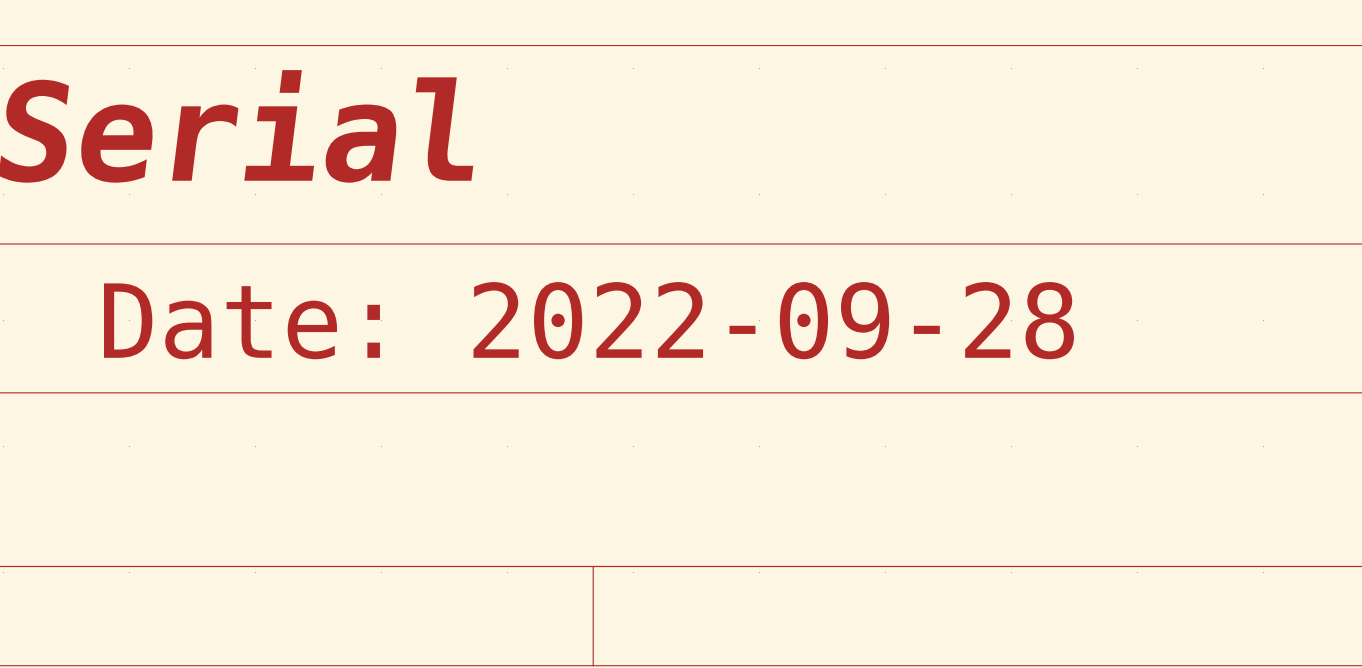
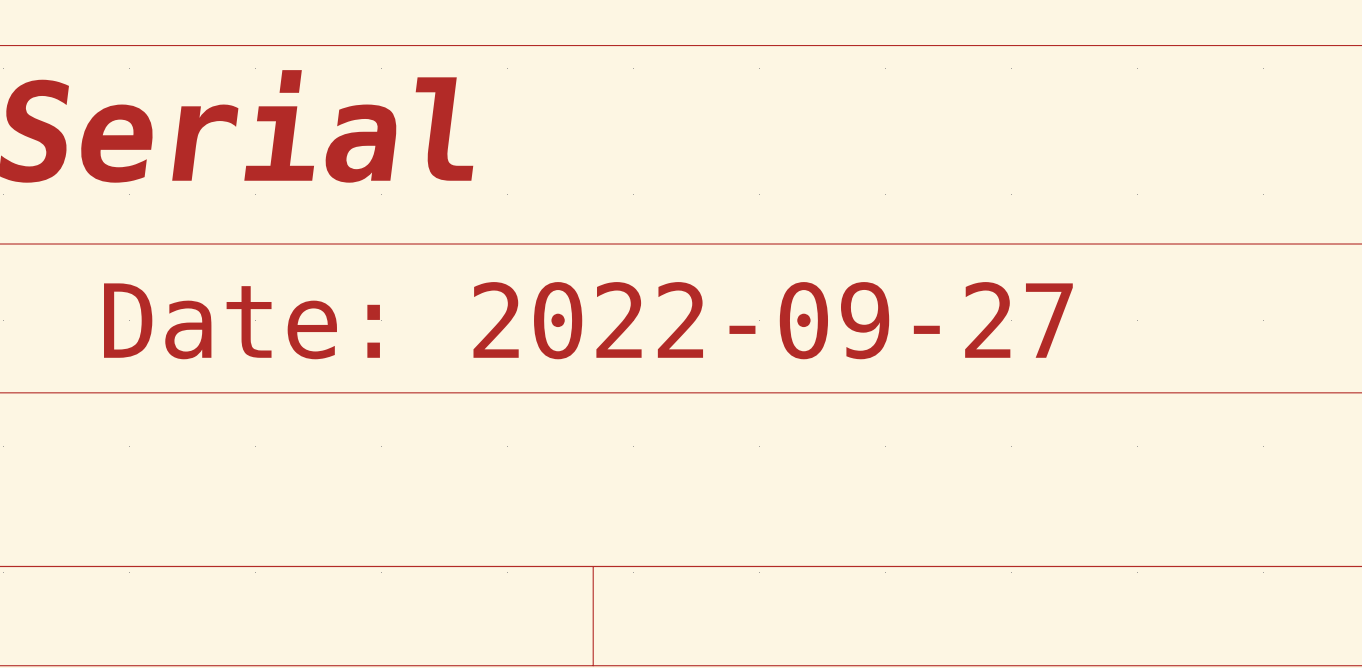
title block: Date: 2022-09-28 (588, 320) -> Date: 2022-09-27 (588, 320)

